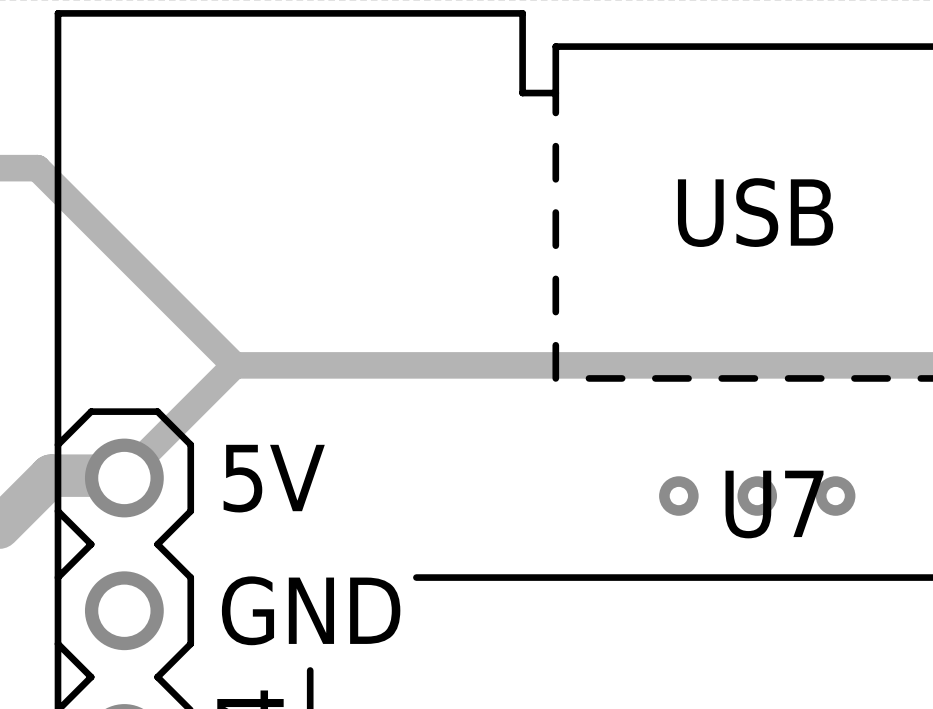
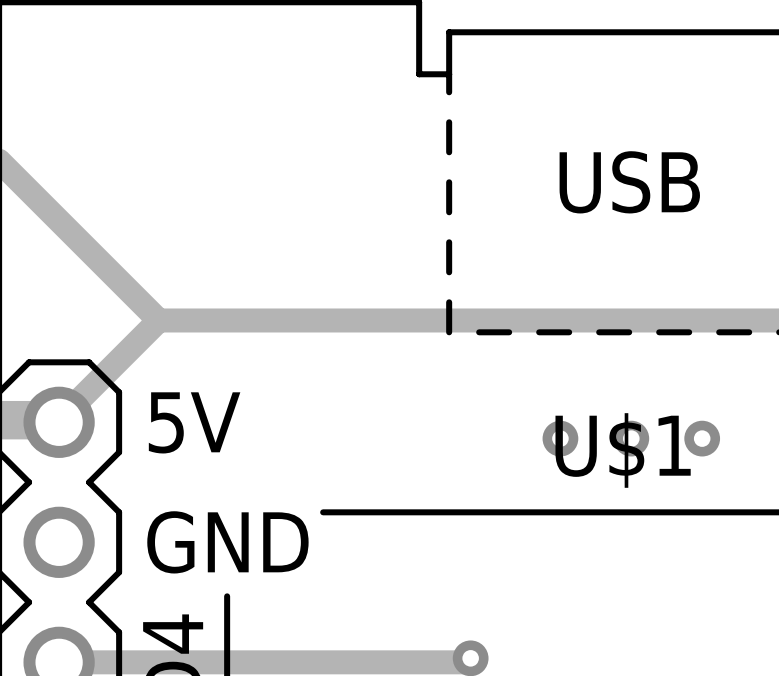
U7 name: U7 (774, 504) -> U$1 (623, 450)

